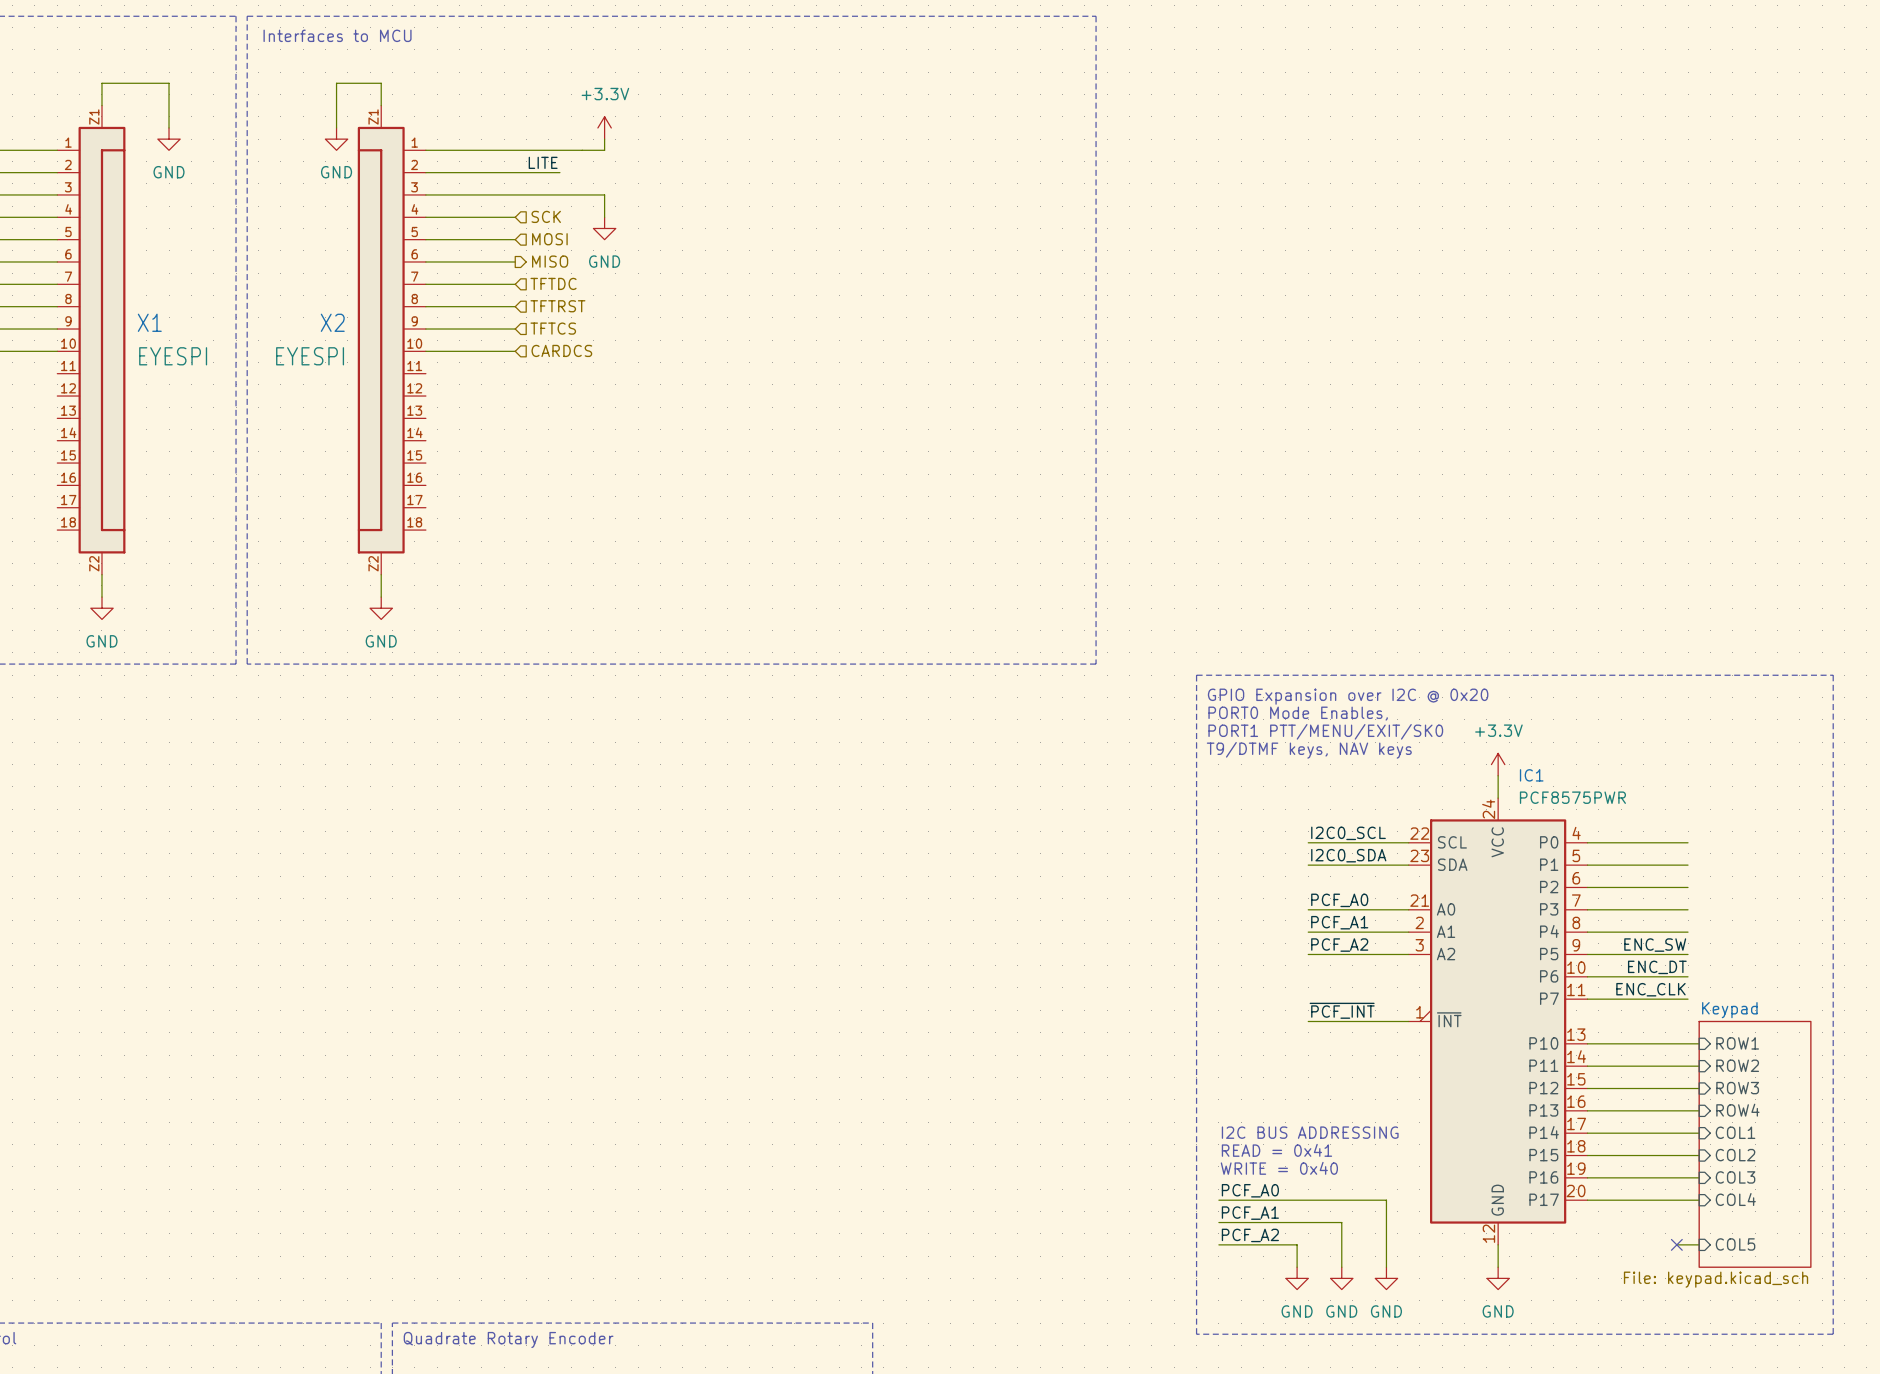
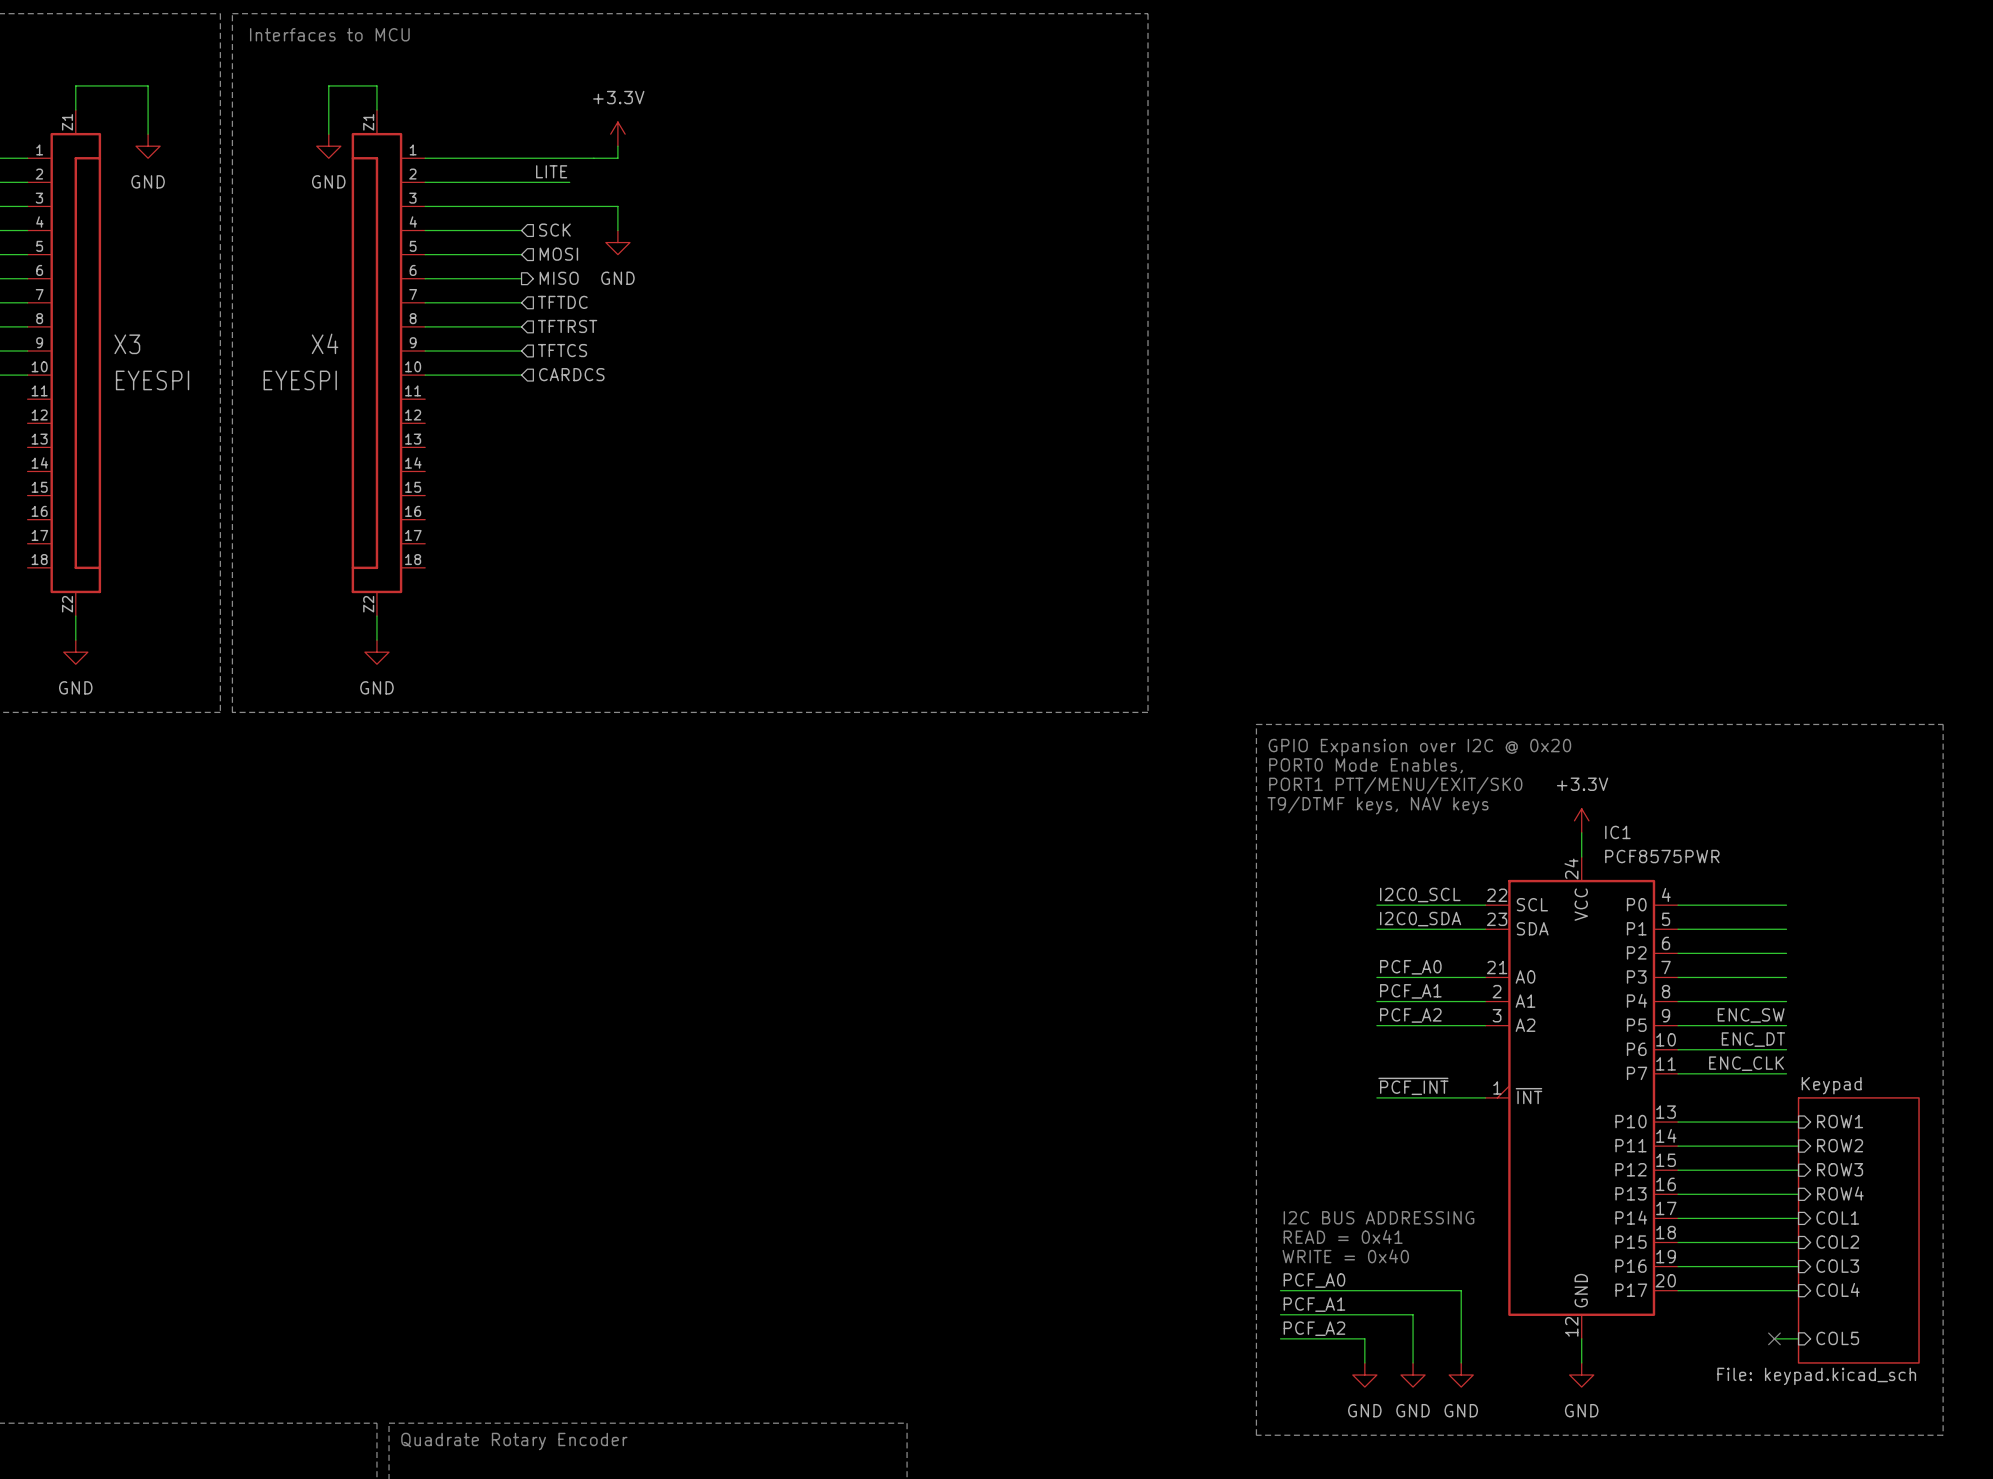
X1 name: X1 (149, 322) -> X3 (127, 344)
X2 name: X2 (332, 322) -> X4 (325, 343)

